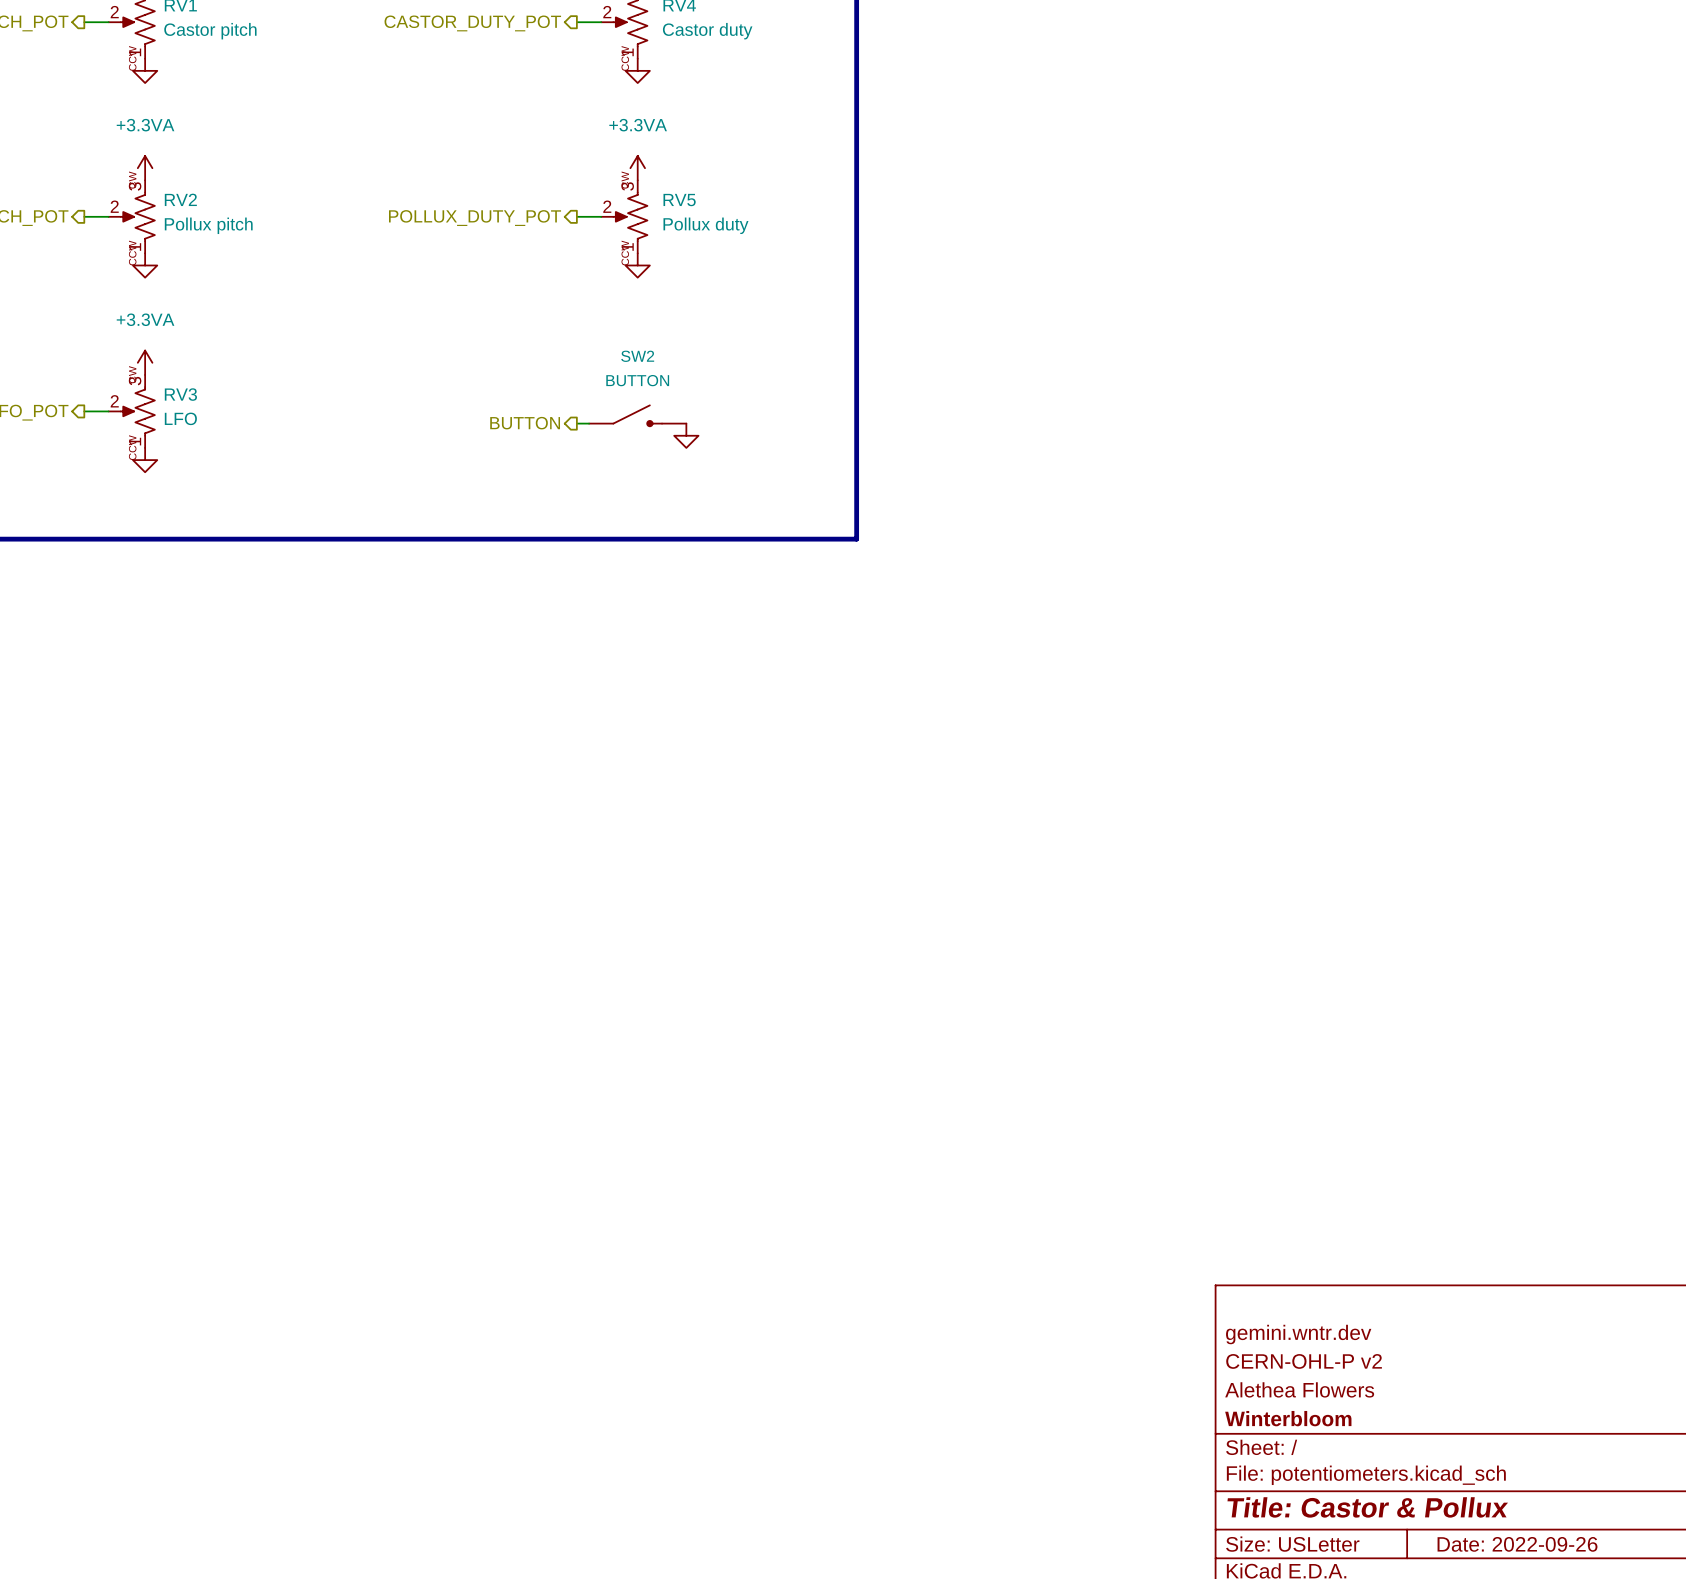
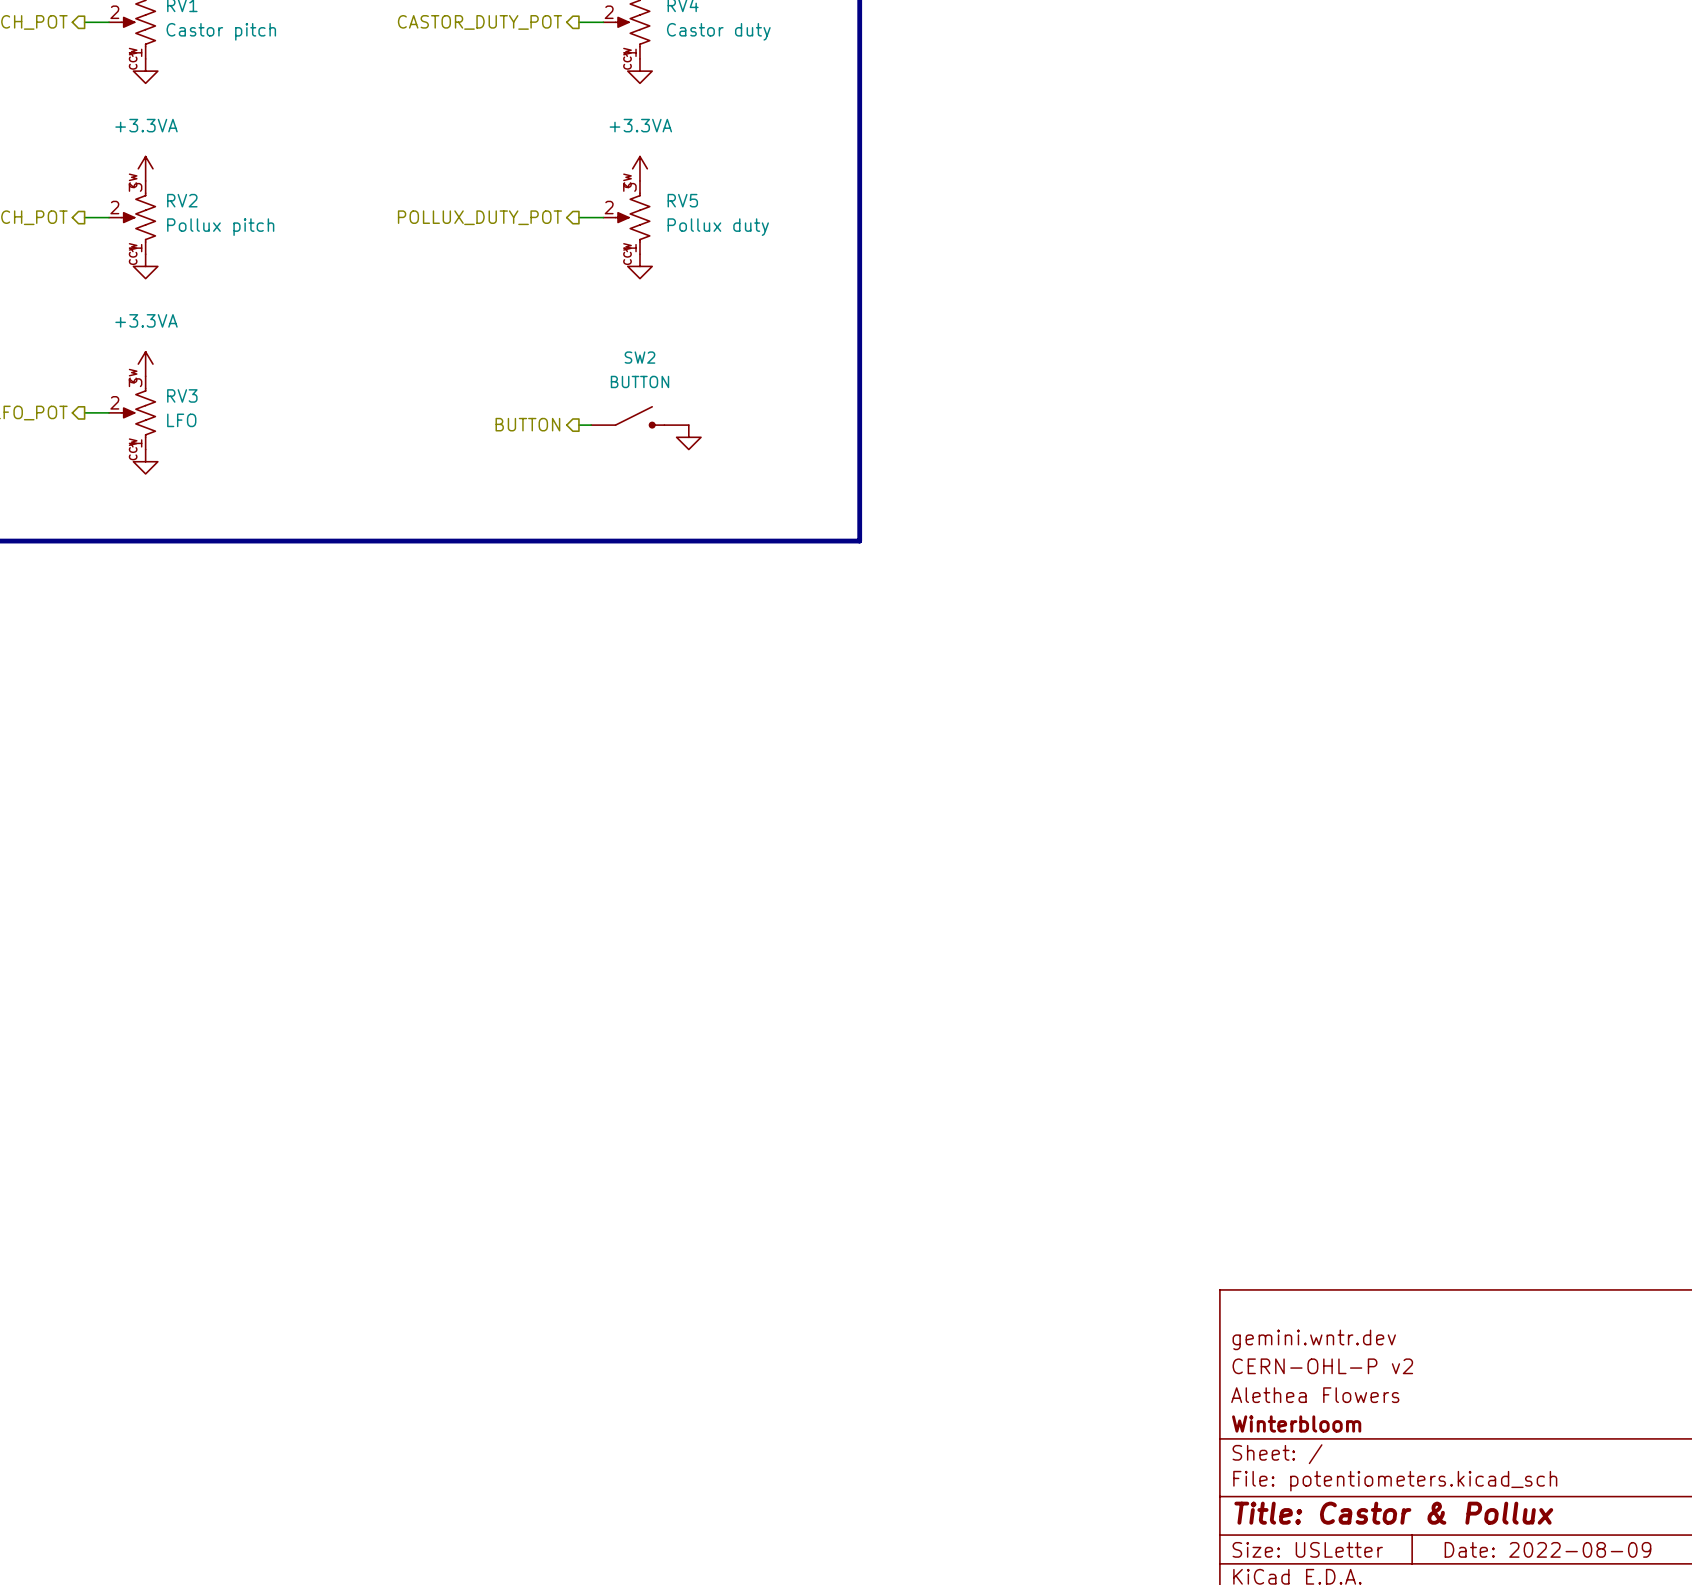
title block: Date: 2022-09-26 (1517, 1544) -> Date: 2022-08-09 (1548, 1549)

